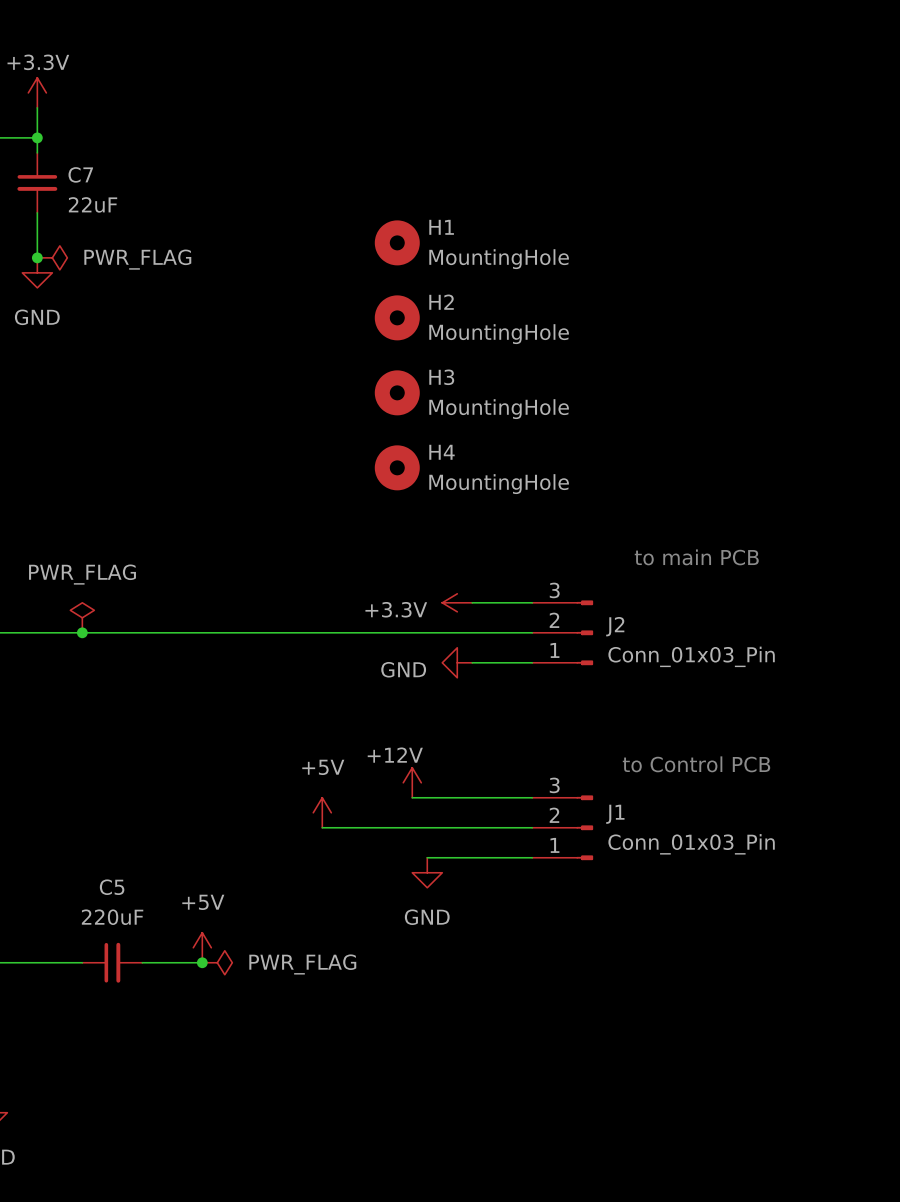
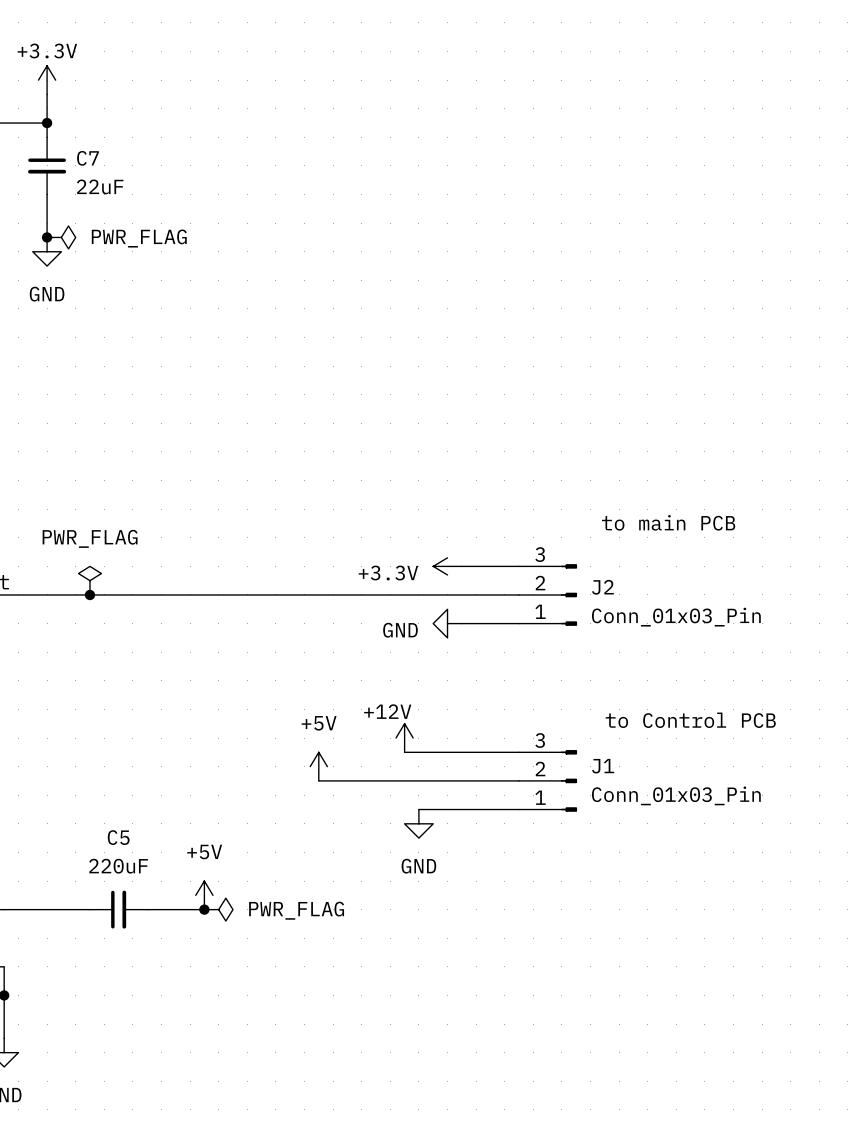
H1: MountingHole (397, 242) -> none
H2: MountingHole (397, 317) -> none
H3: MountingHole (397, 392) -> none
H4: MountingHole (397, 467) -> none

